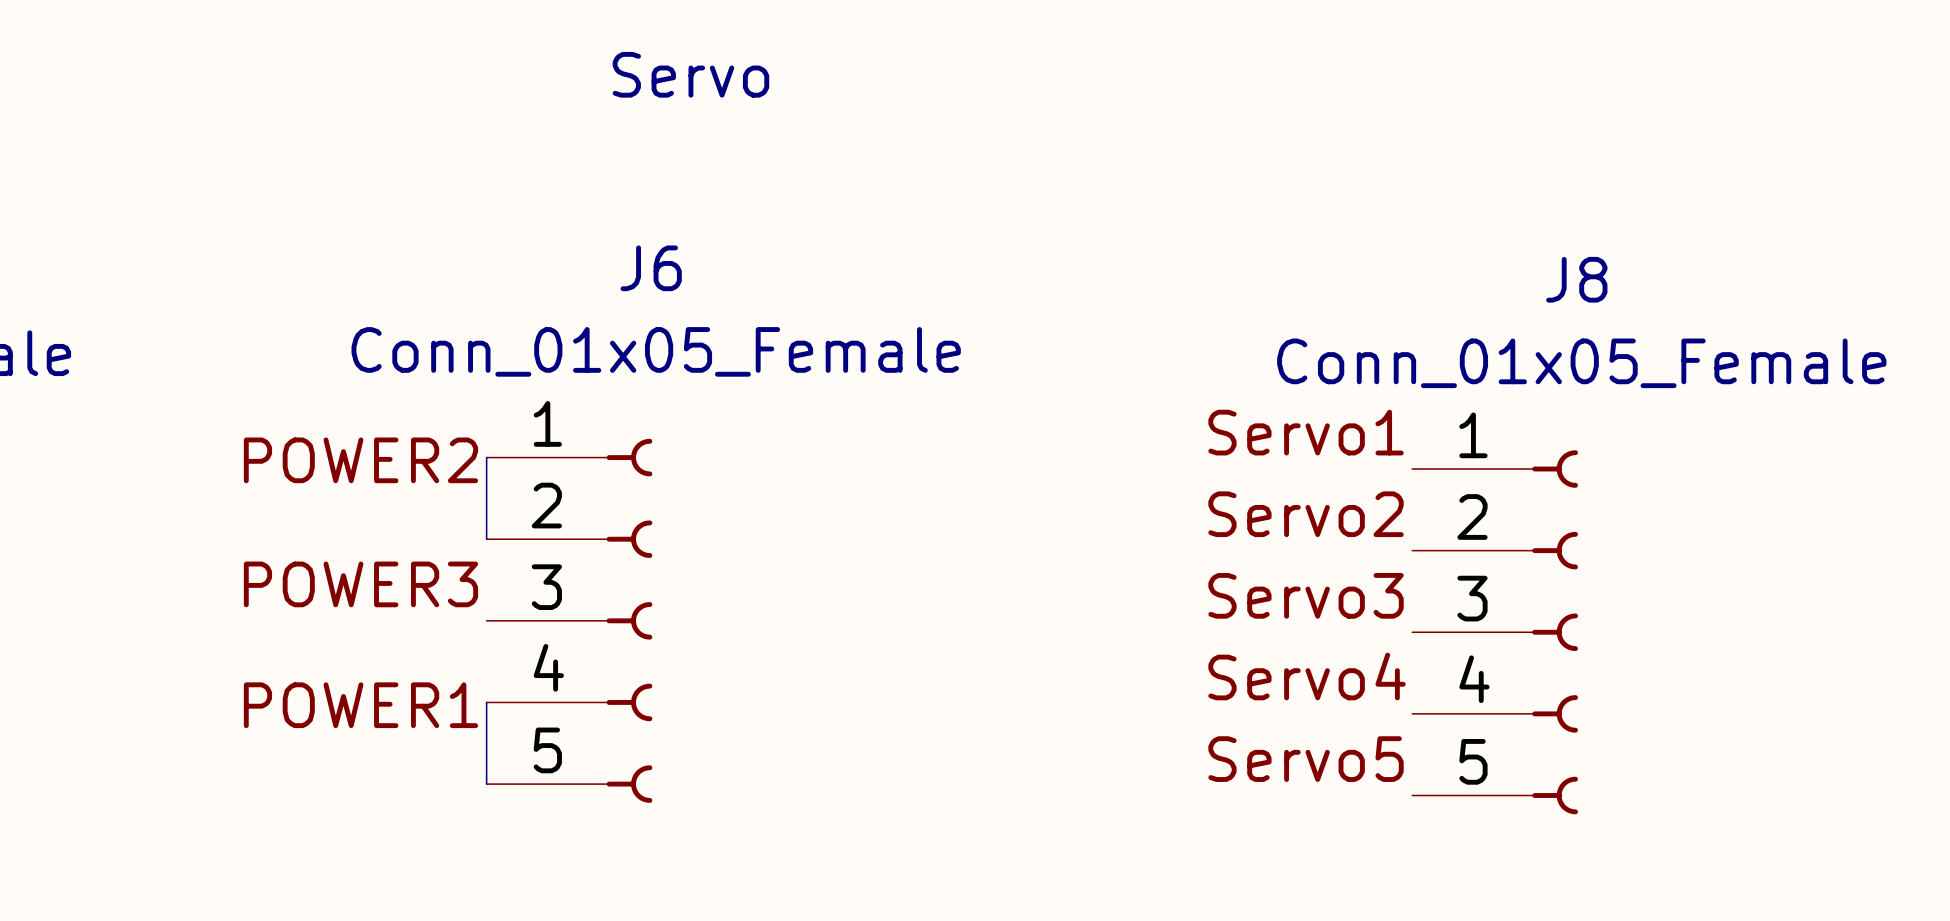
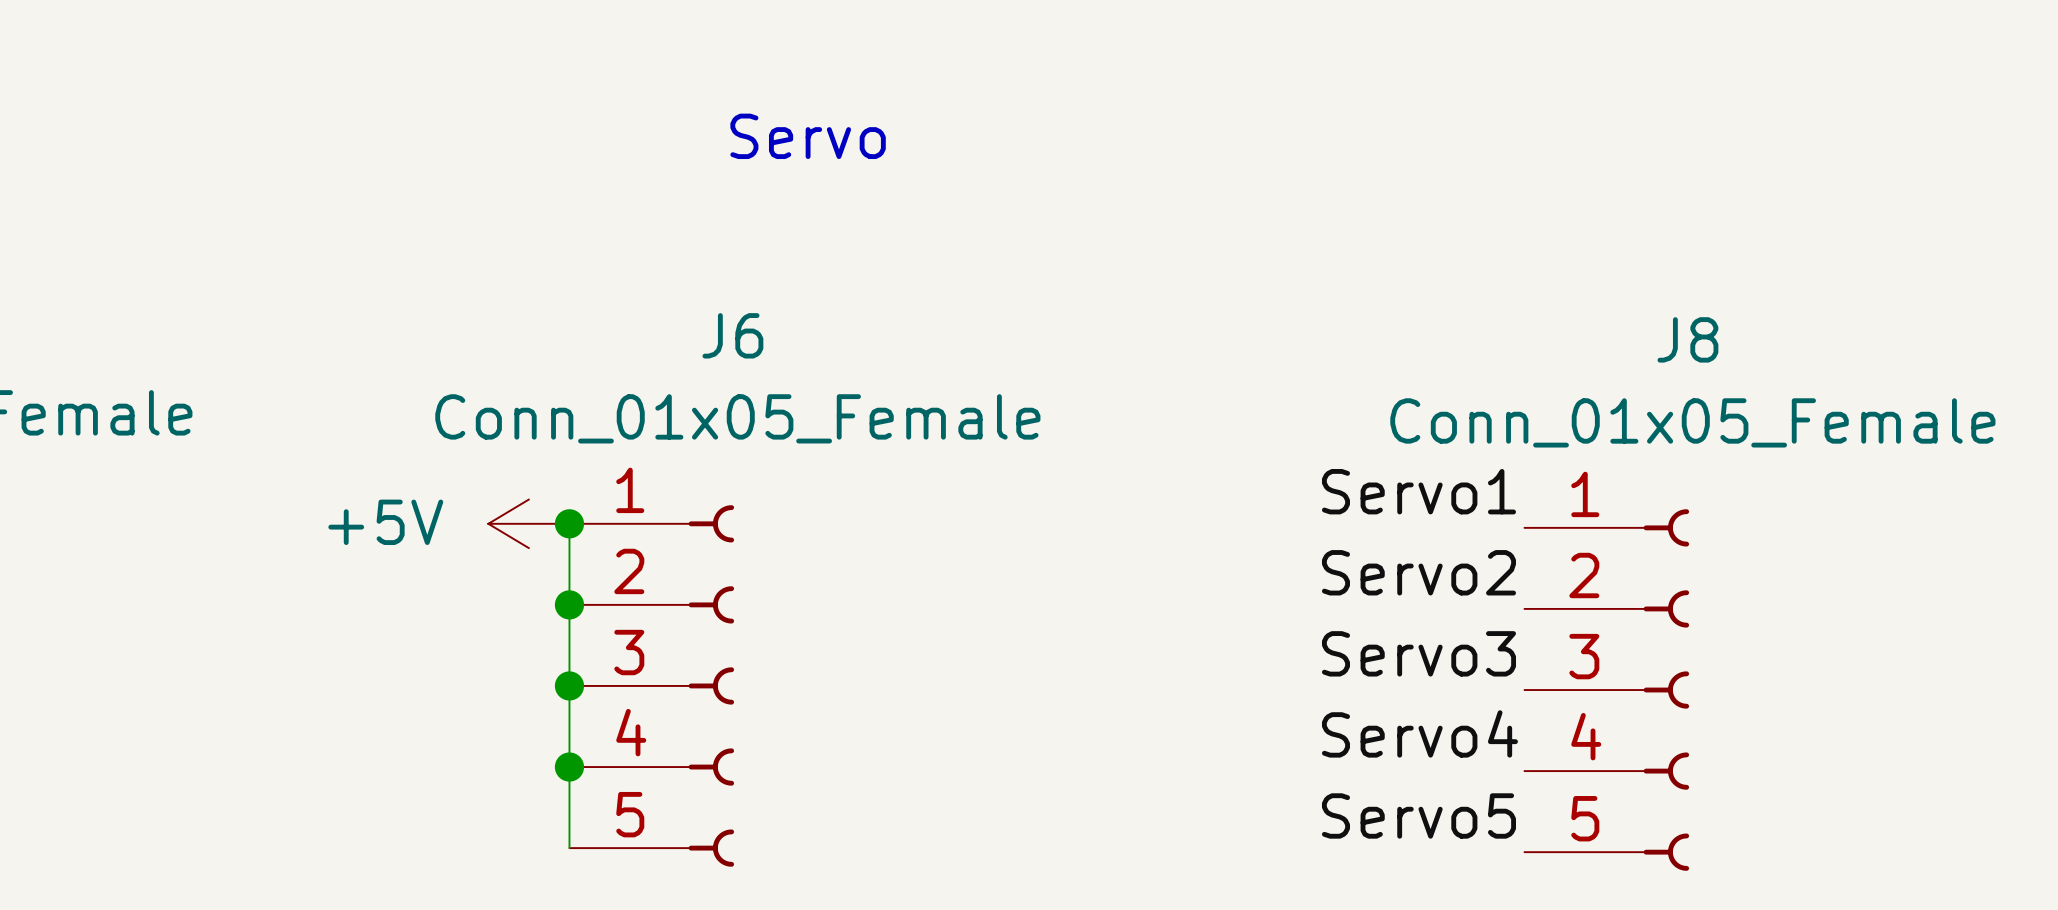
wire: (486, 457) (486, 539) -> none
label: POWER2 (360, 460) -> none
power symbol: none -> +5V (528, 523)
wire: none -> (569, 523) (569, 848)
junction: none -> (569, 523)
junction: none -> (569, 604)
label: POWER3 (360, 584) -> none
J6 position: (569, 620) -> (651, 685)
junction: none -> (569, 685)
wire: (486, 702) (486, 784) -> none
label: POWER1 (360, 705) -> none
junction: none -> (569, 767)

